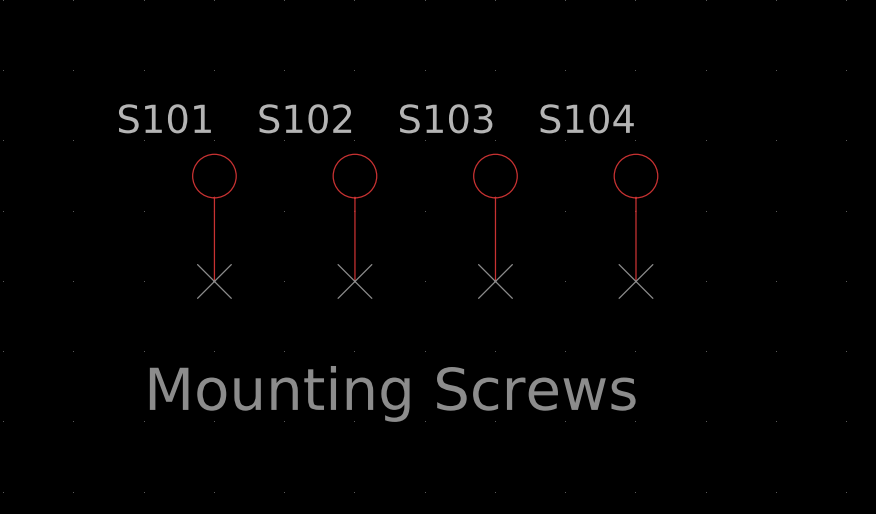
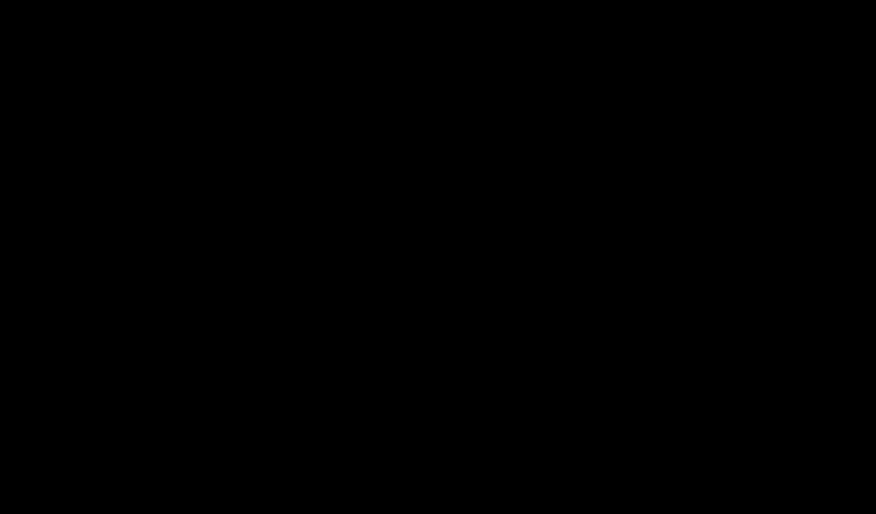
S101: (214, 217) -> none
S102: (354, 217) -> none
S103: (495, 217) -> none
S104: (635, 217) -> none
no-connect mark: (214, 281) -> none
no-connect mark: (354, 281) -> none
no-connect mark: (495, 281) -> none
no-connect mark: (635, 281) -> none
text: Mounting Screws (392, 393) -> none

